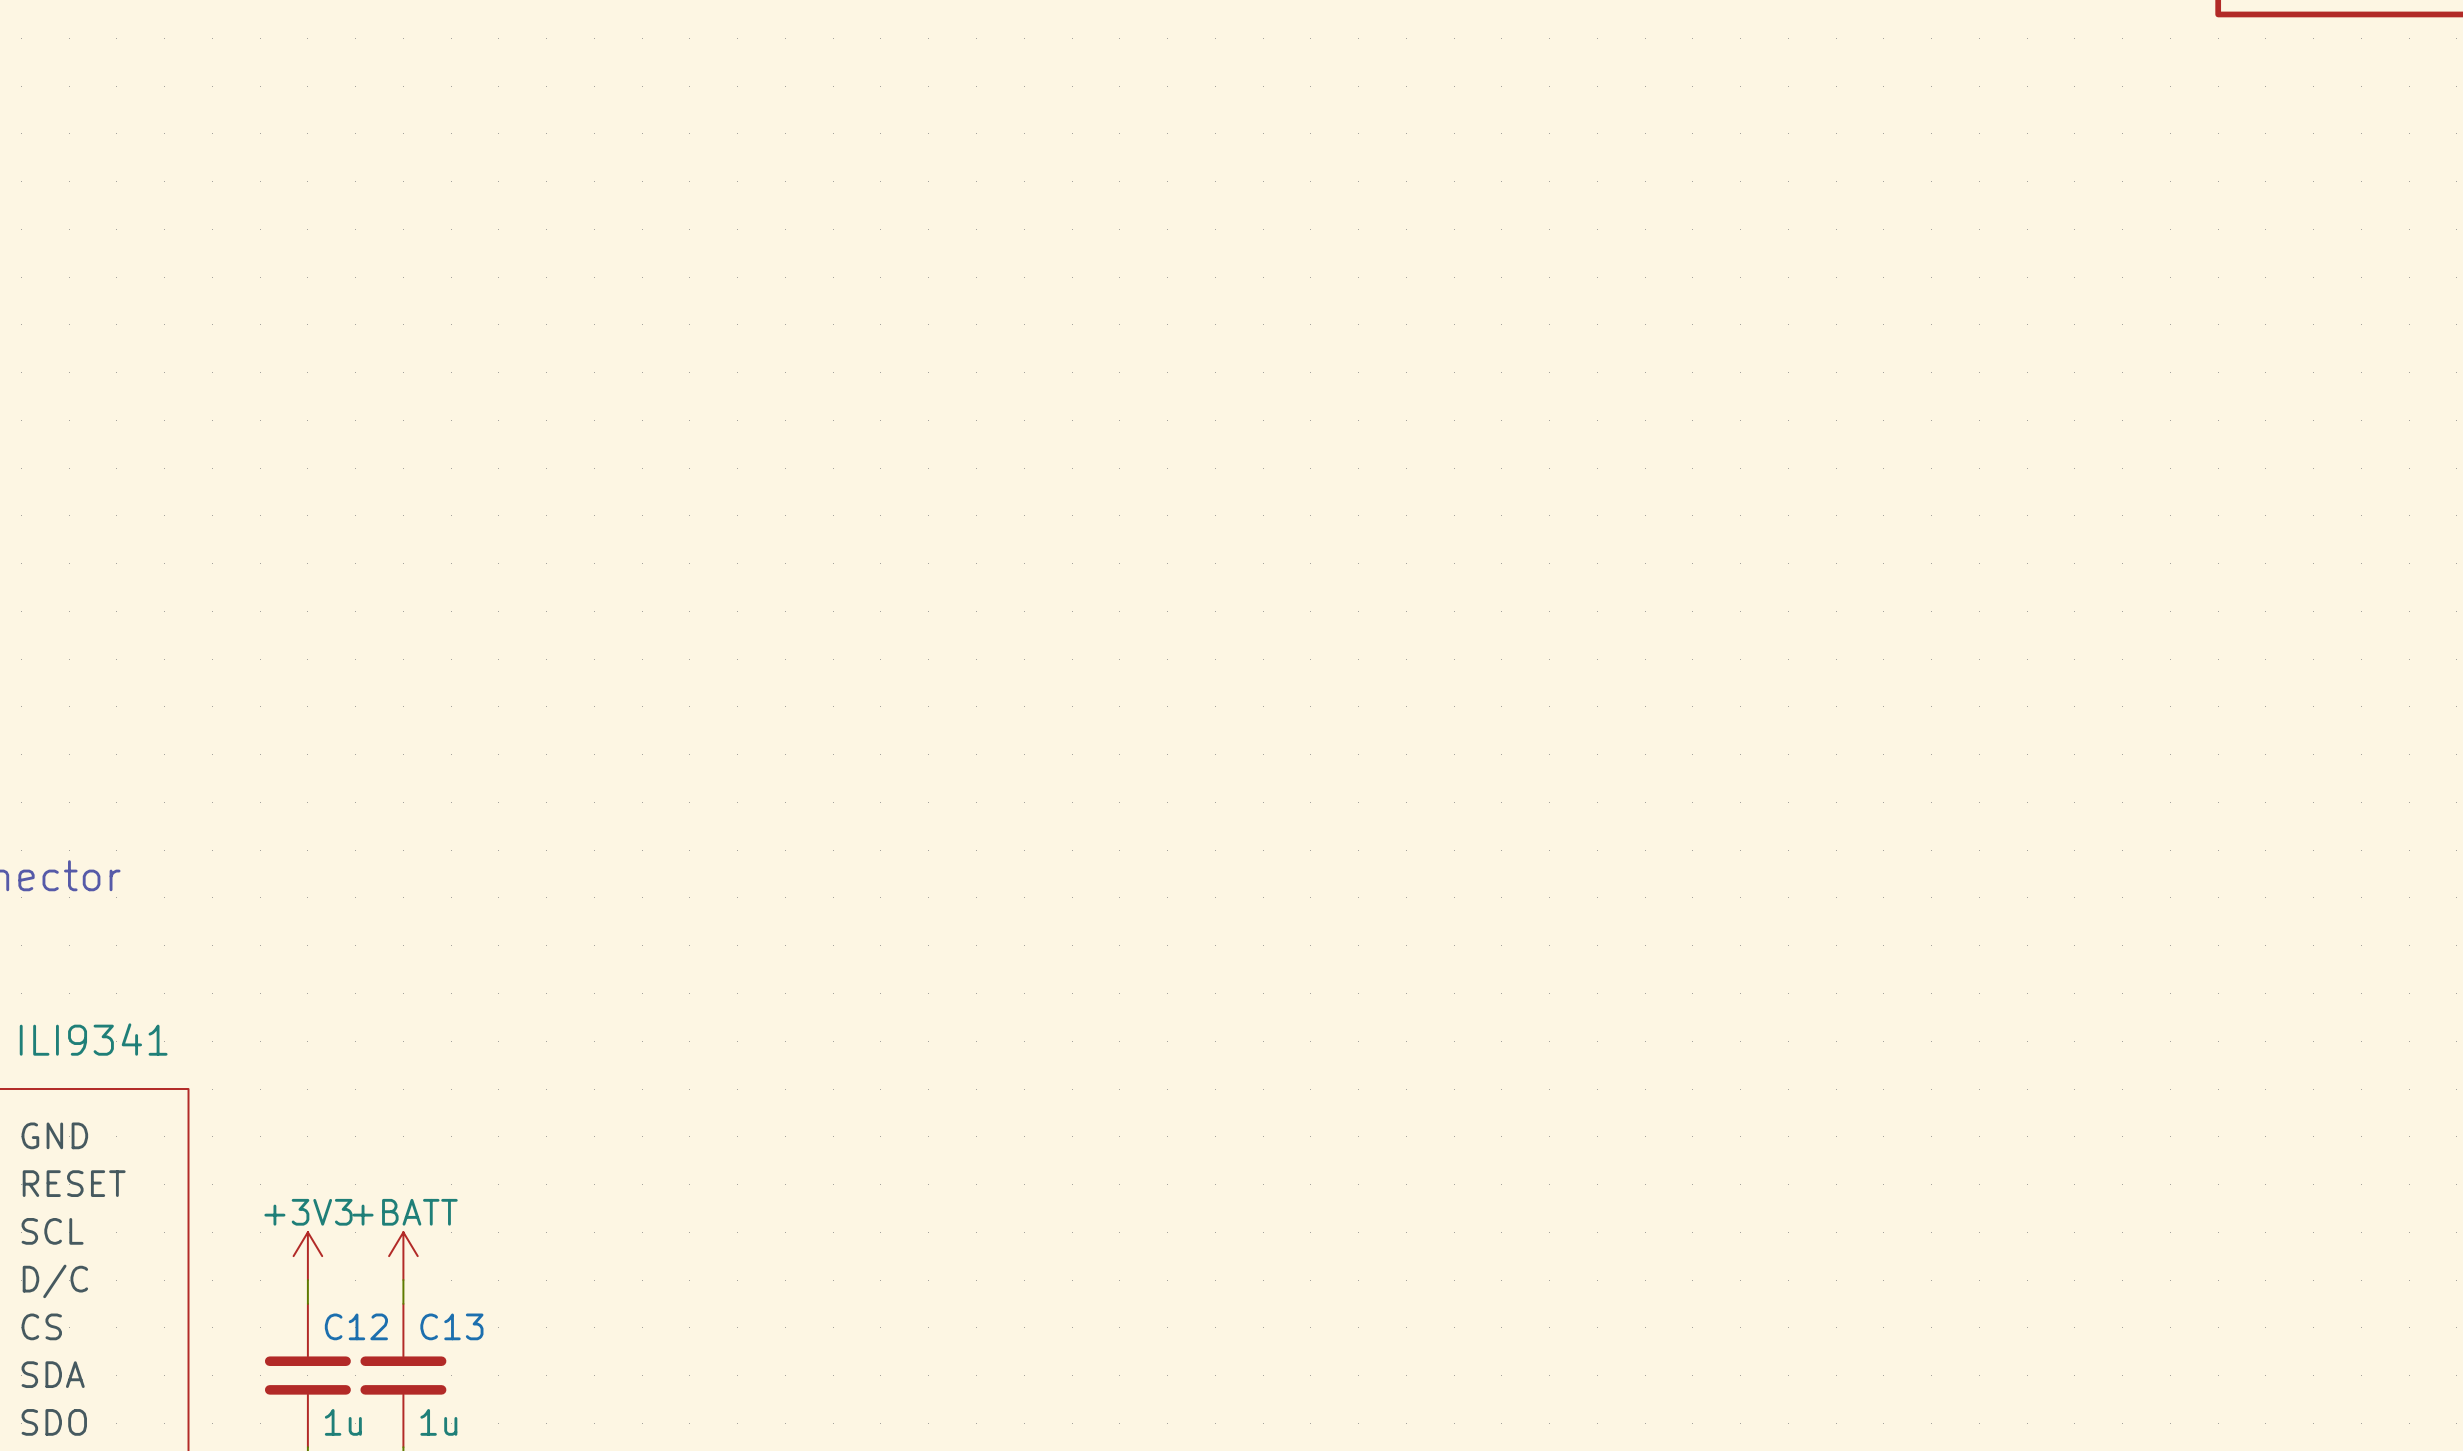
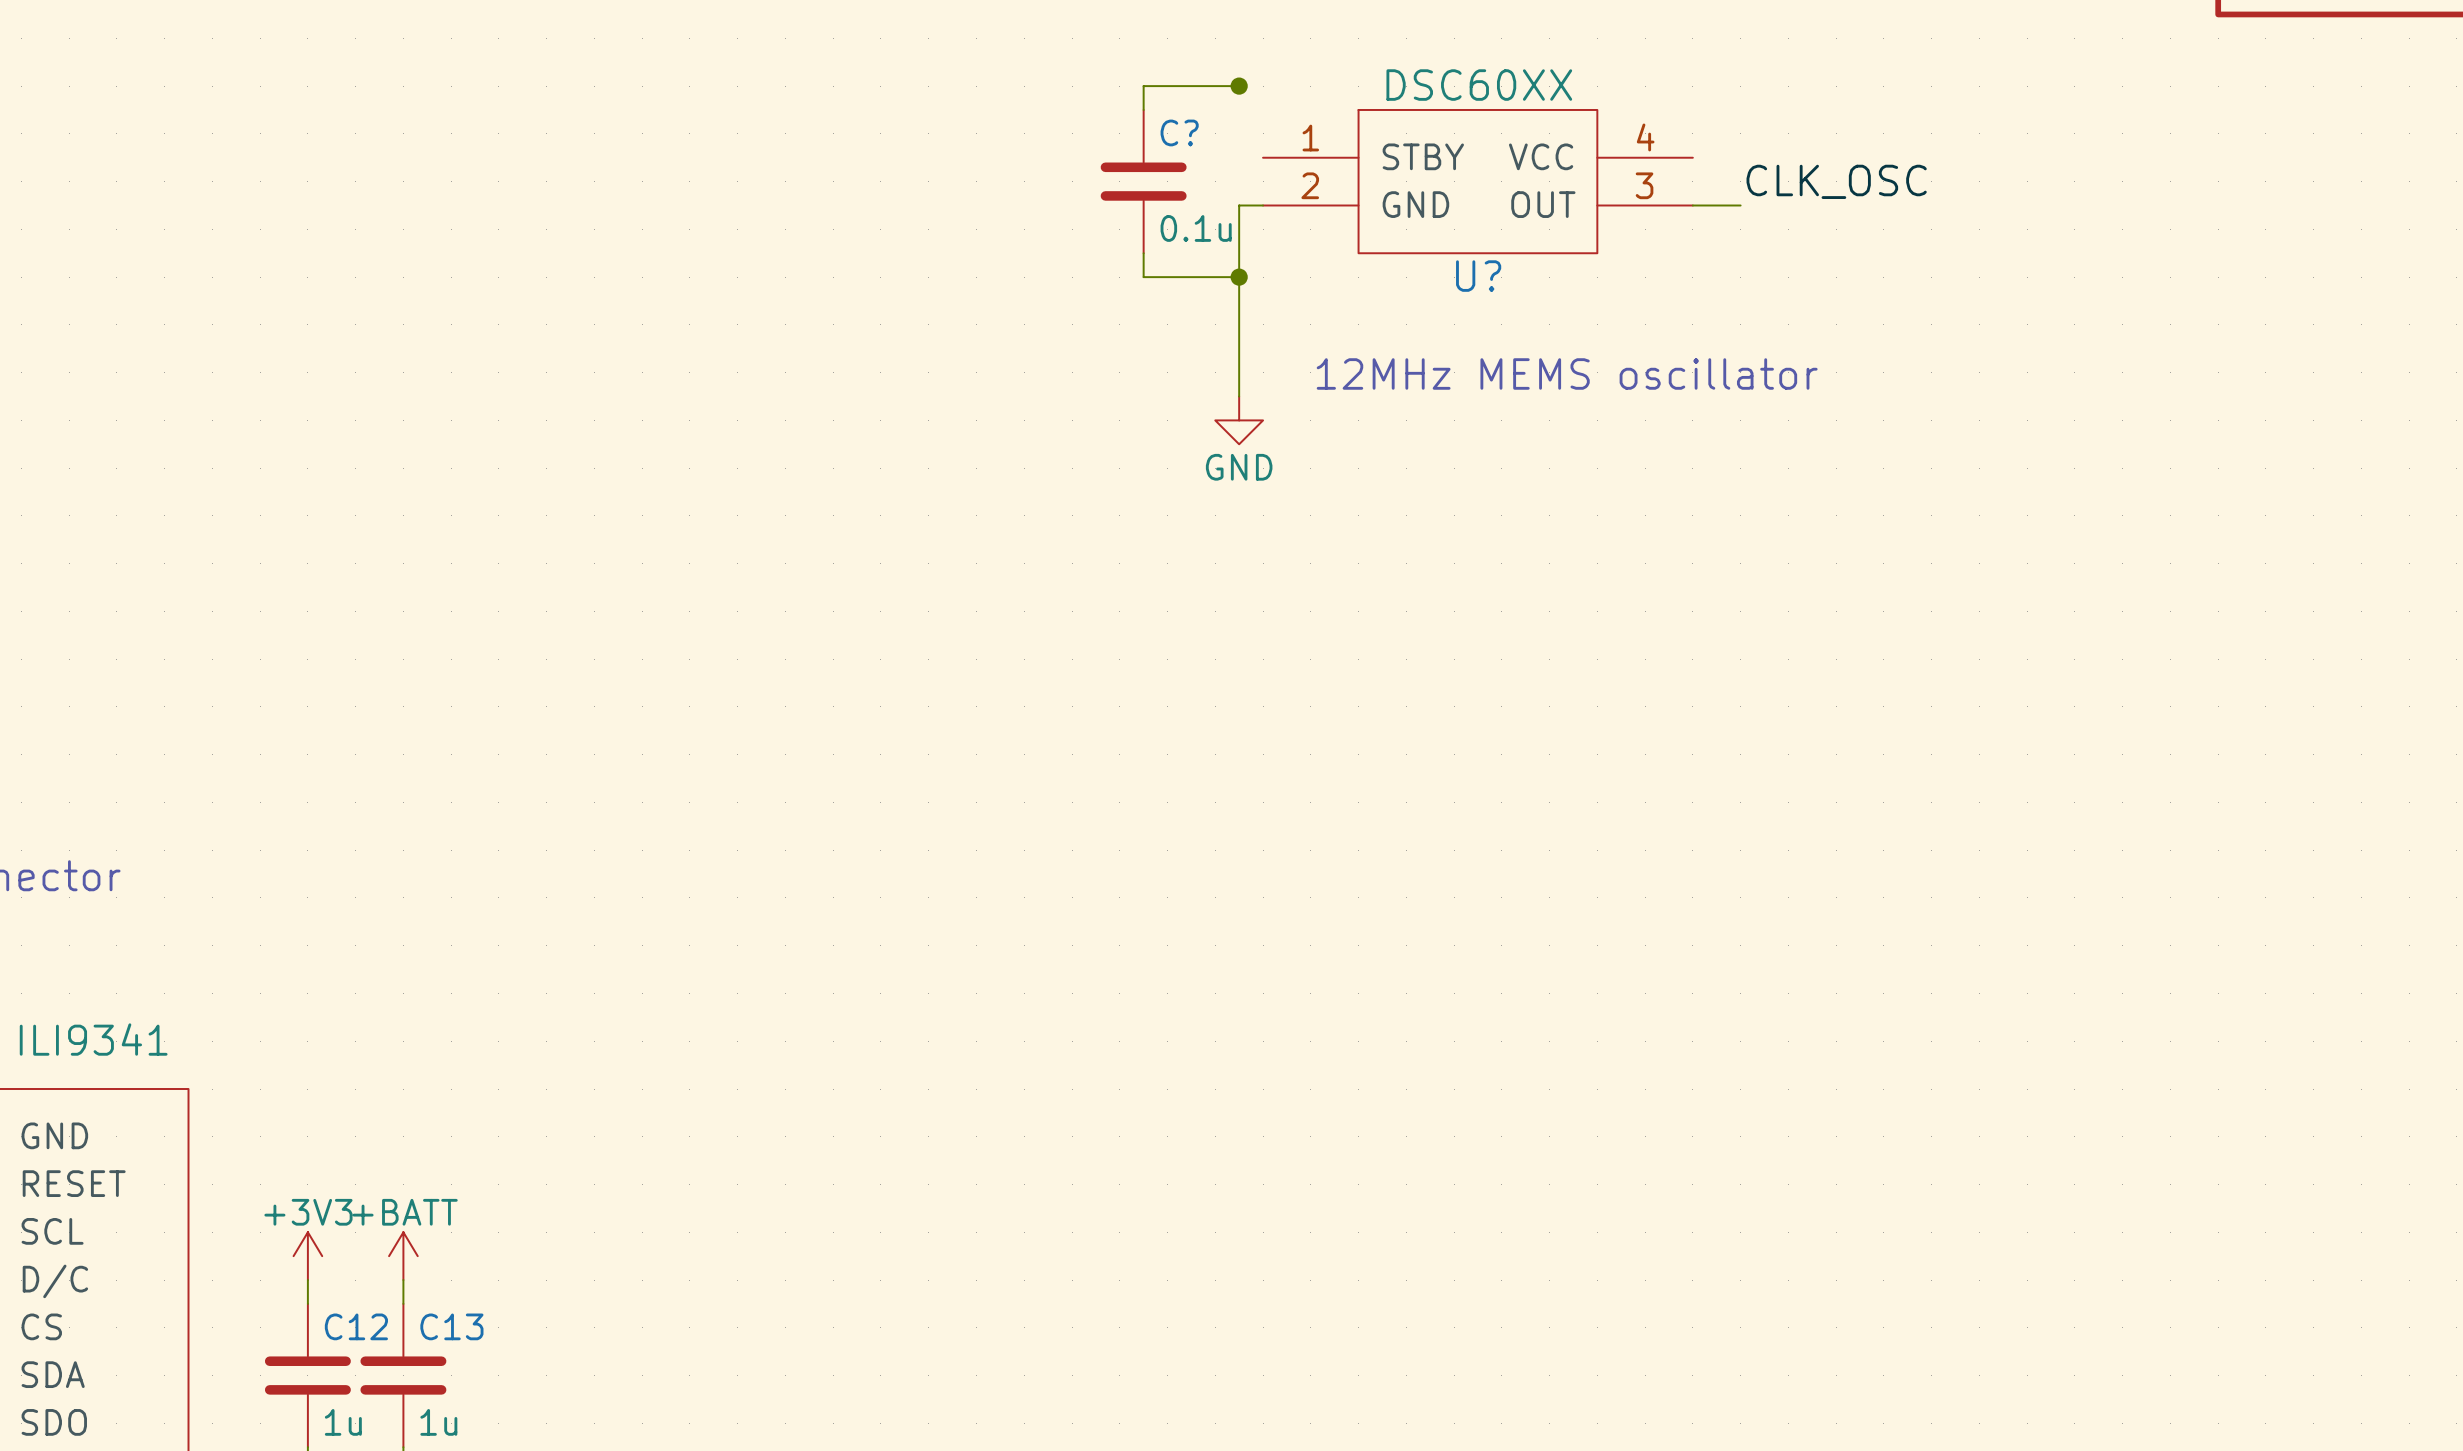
wire: none -> (1239, 86) (1143, 86) (1143, 109)
junction: none -> (1239, 86)
C?: none -> 0.1u (1143, 181)
U?: none -> DSC60XX (1477, 181)
label: none -> CLK_OSC (1836, 181)
wire: none -> (1263, 205) (1239, 205) (1239, 396)
wire: none -> (1692, 205) (1740, 205)
wire: none -> (1143, 253) (1143, 277) (1239, 277)
junction: none -> (1239, 277)
text: none -> 12MHz MEMS oscillator (1567, 373)
power symbol: none -> GND (1239, 420)

